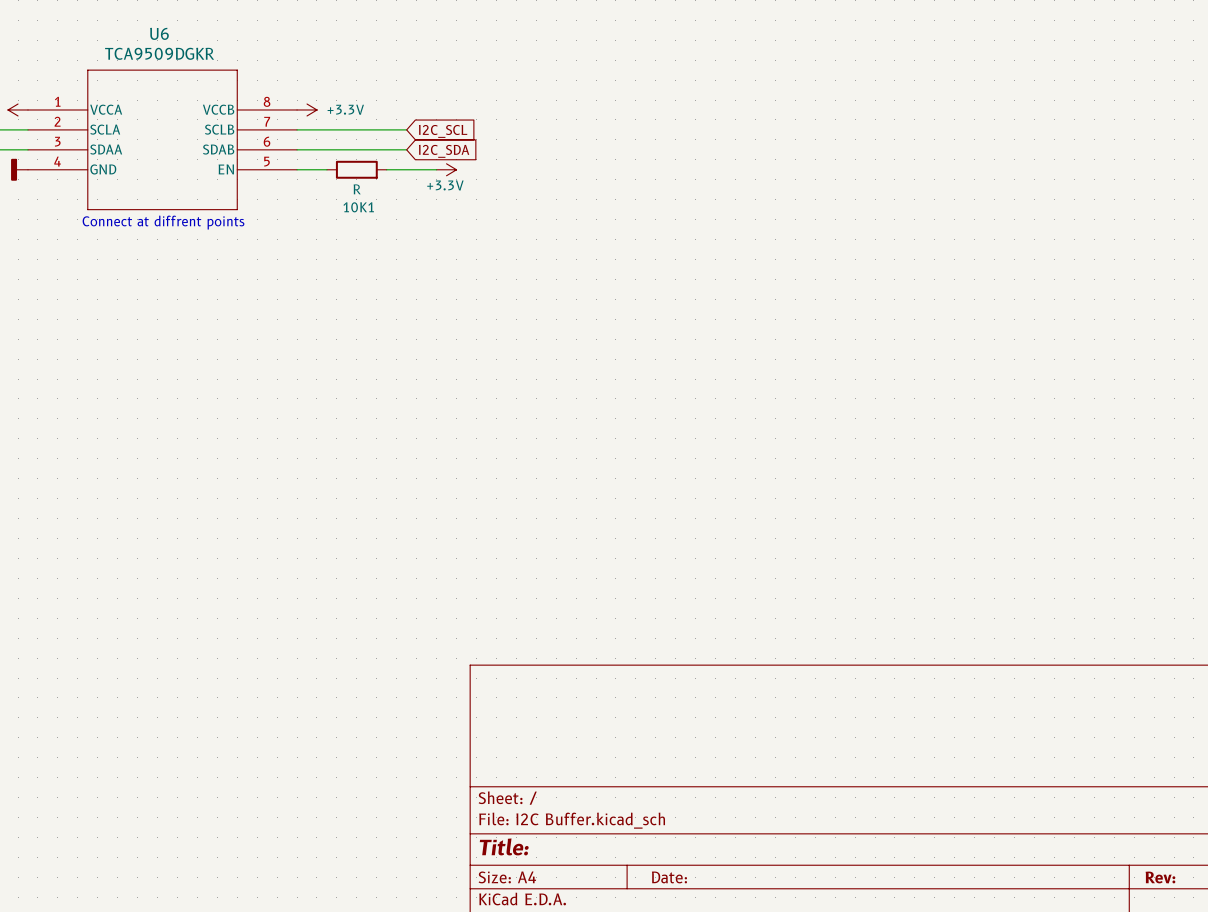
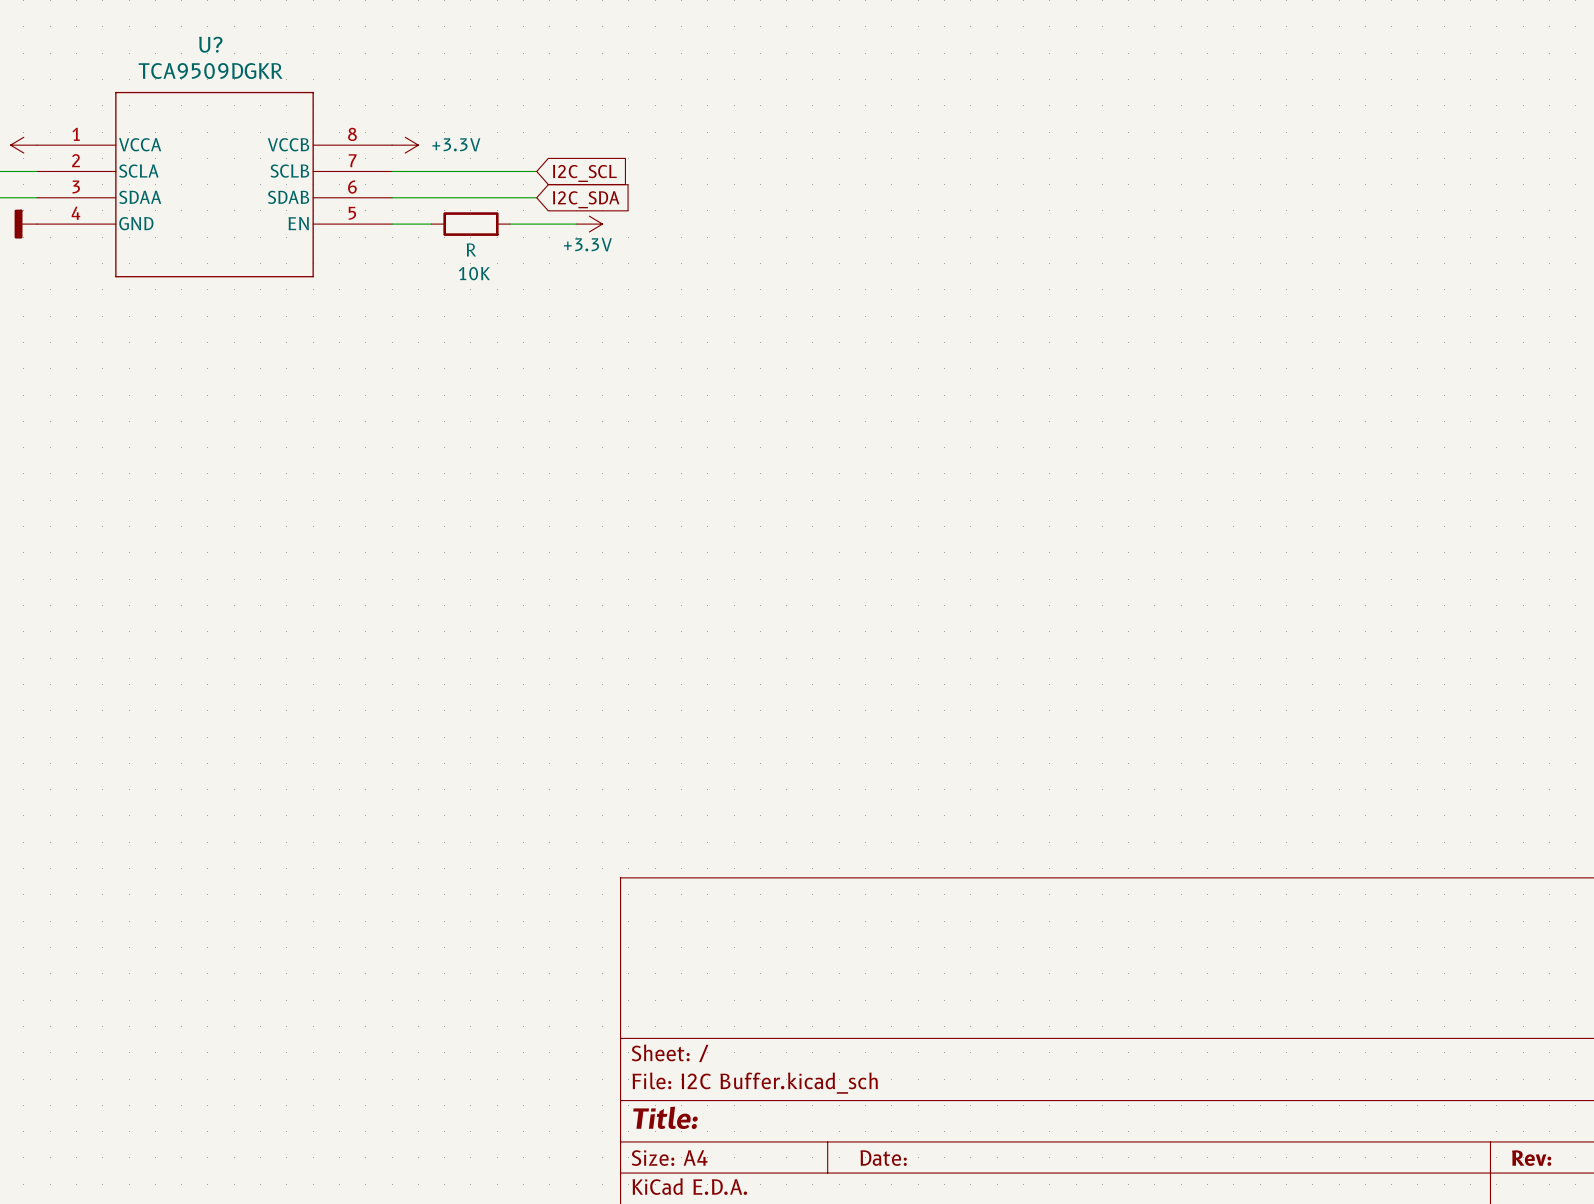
U6 name: U6 (159, 33) -> U? (210, 44)
10K1 name: 10K1 (358, 207) -> 10K (474, 273)
text: Connect at diffrent points (163, 222) -> none

